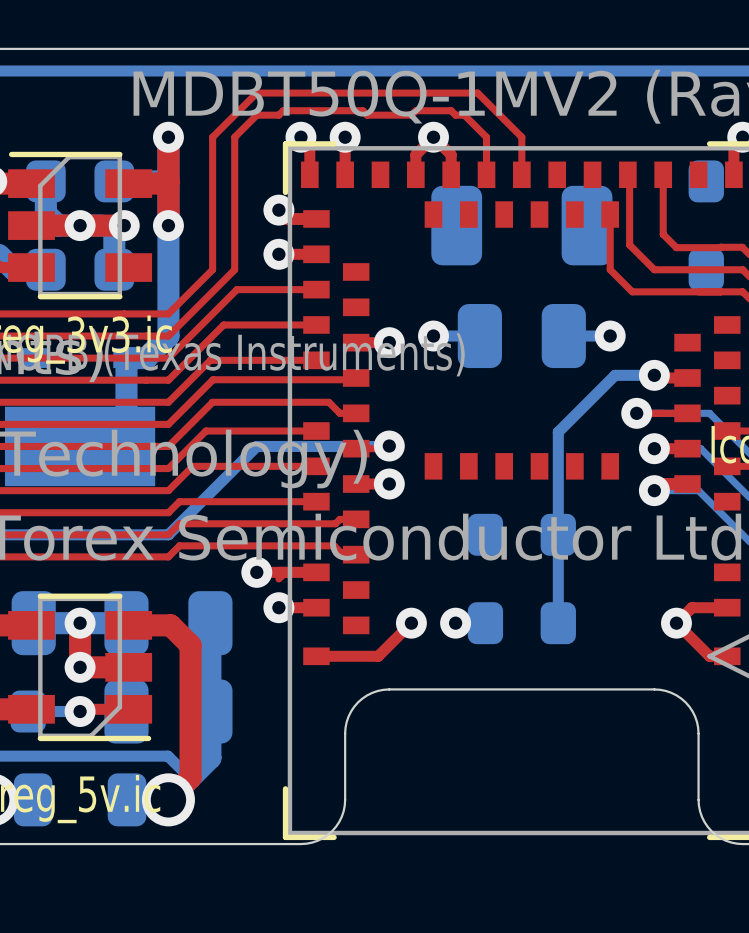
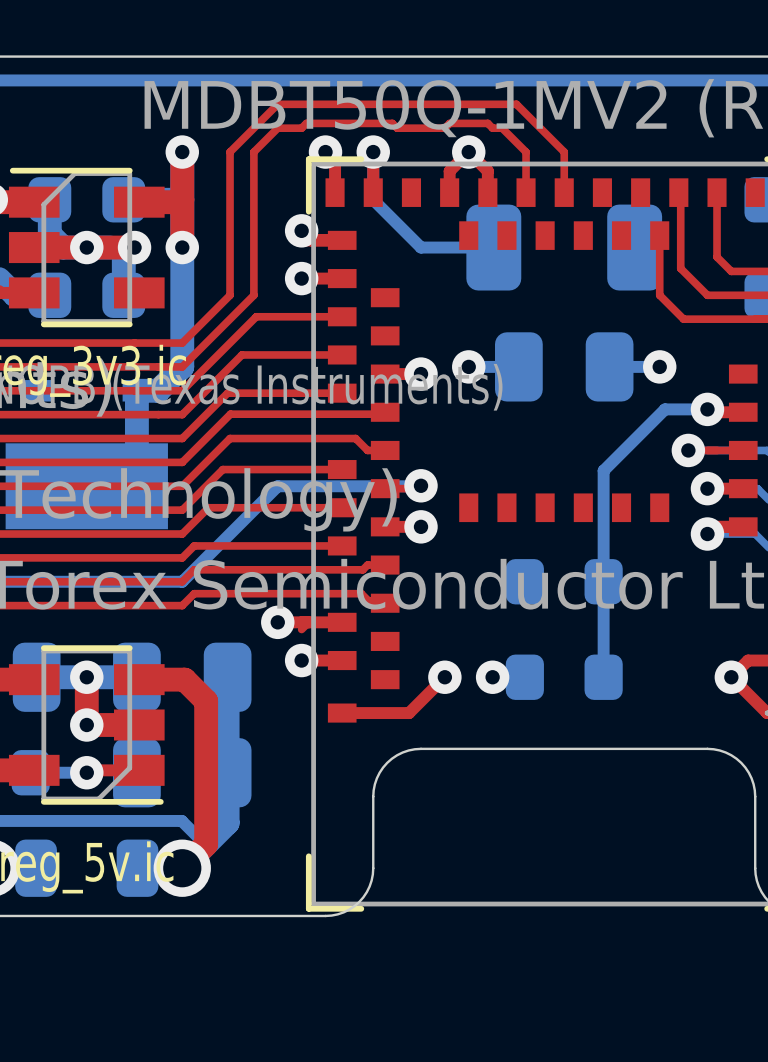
bottom track: none -> (373, 152) (373, 199) (421, 247) (493, 247)

